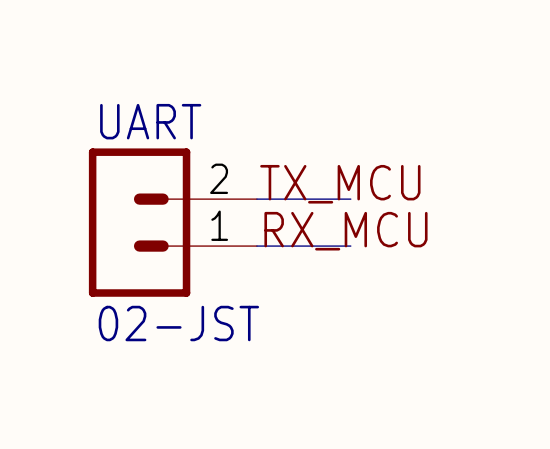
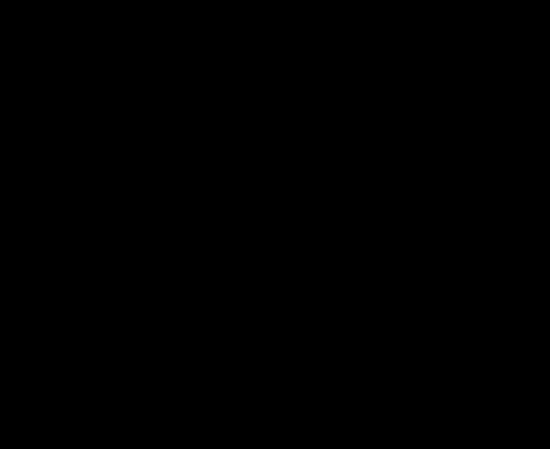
label: TX_MCU (340, 184) -> none
wire: (256, 199) (350, 199) -> none
UART: 02-JST (172, 222) -> none
label: RX_MCU (345, 231) -> none
wire: (256, 246) (350, 246) -> none

